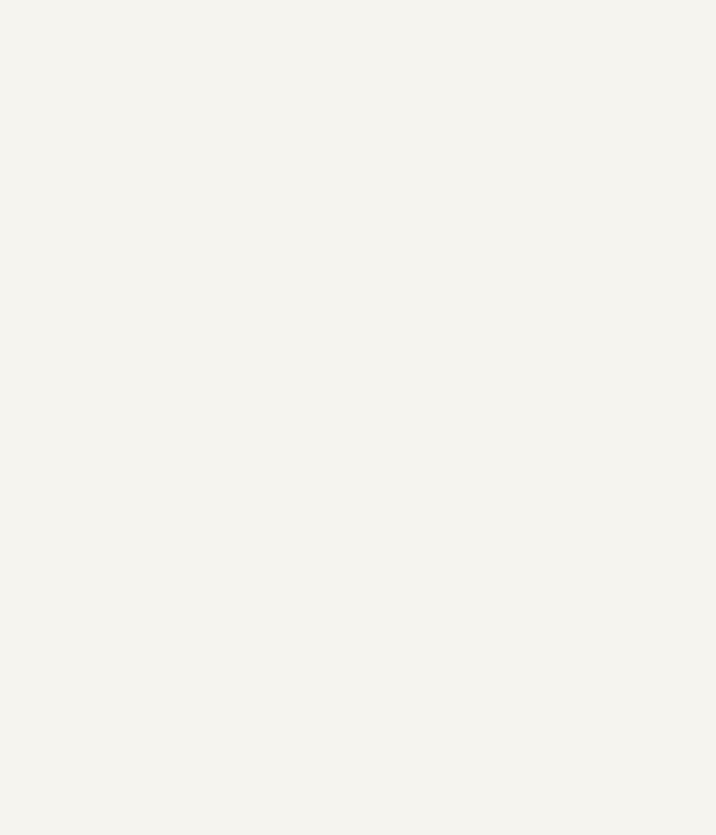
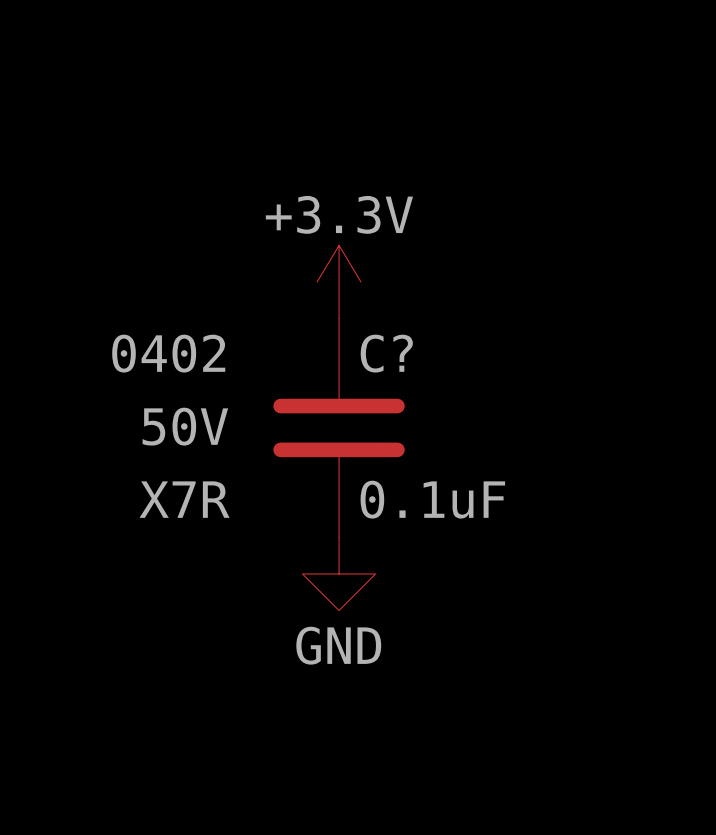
power symbol: none -> +3.3V (339, 281)
C?: none -> 0.1uF (339, 427)
power symbol: none -> GND (339, 574)

